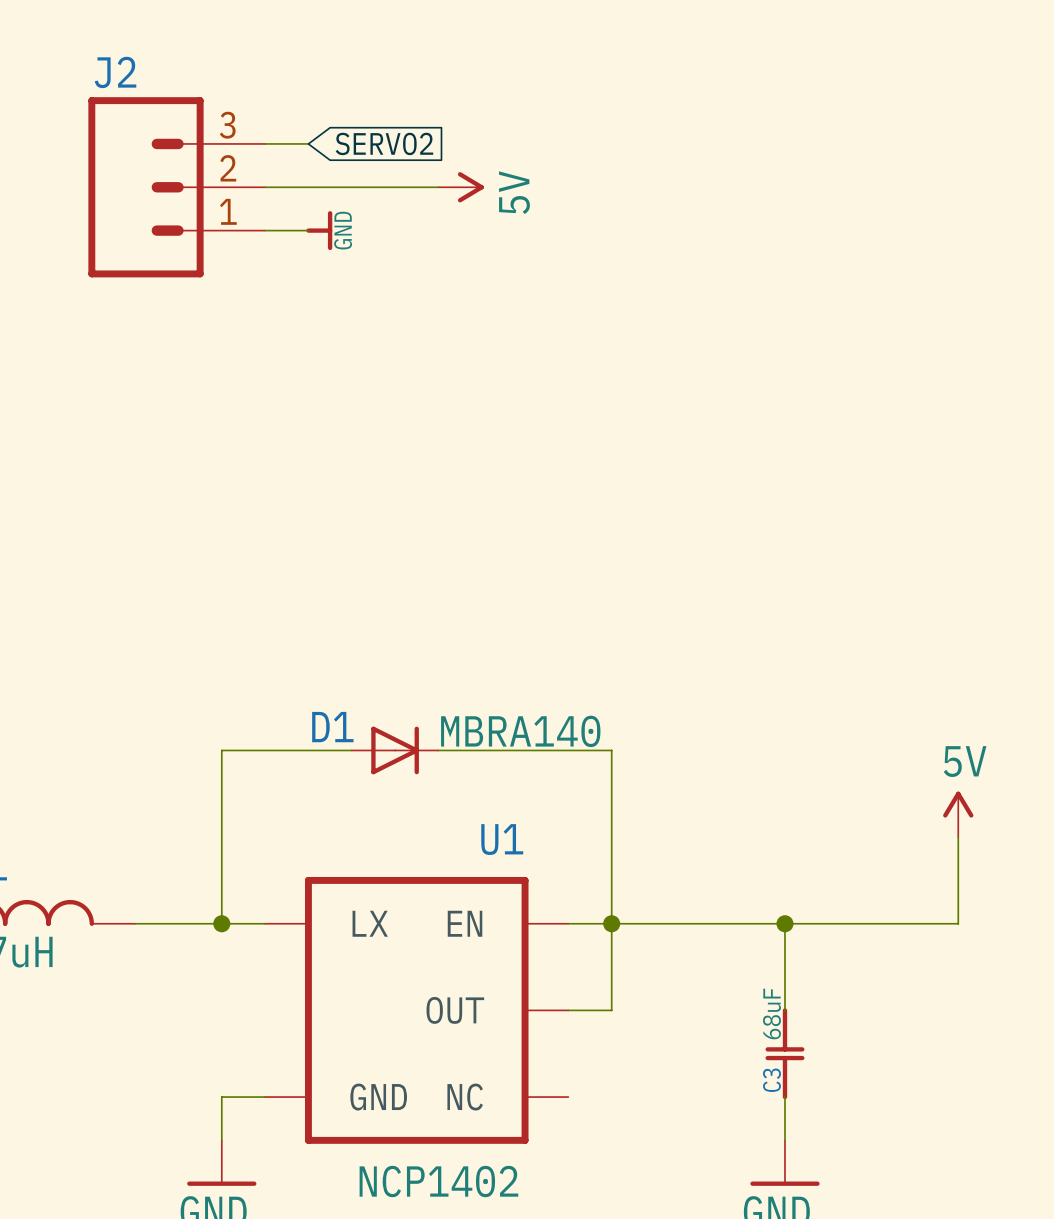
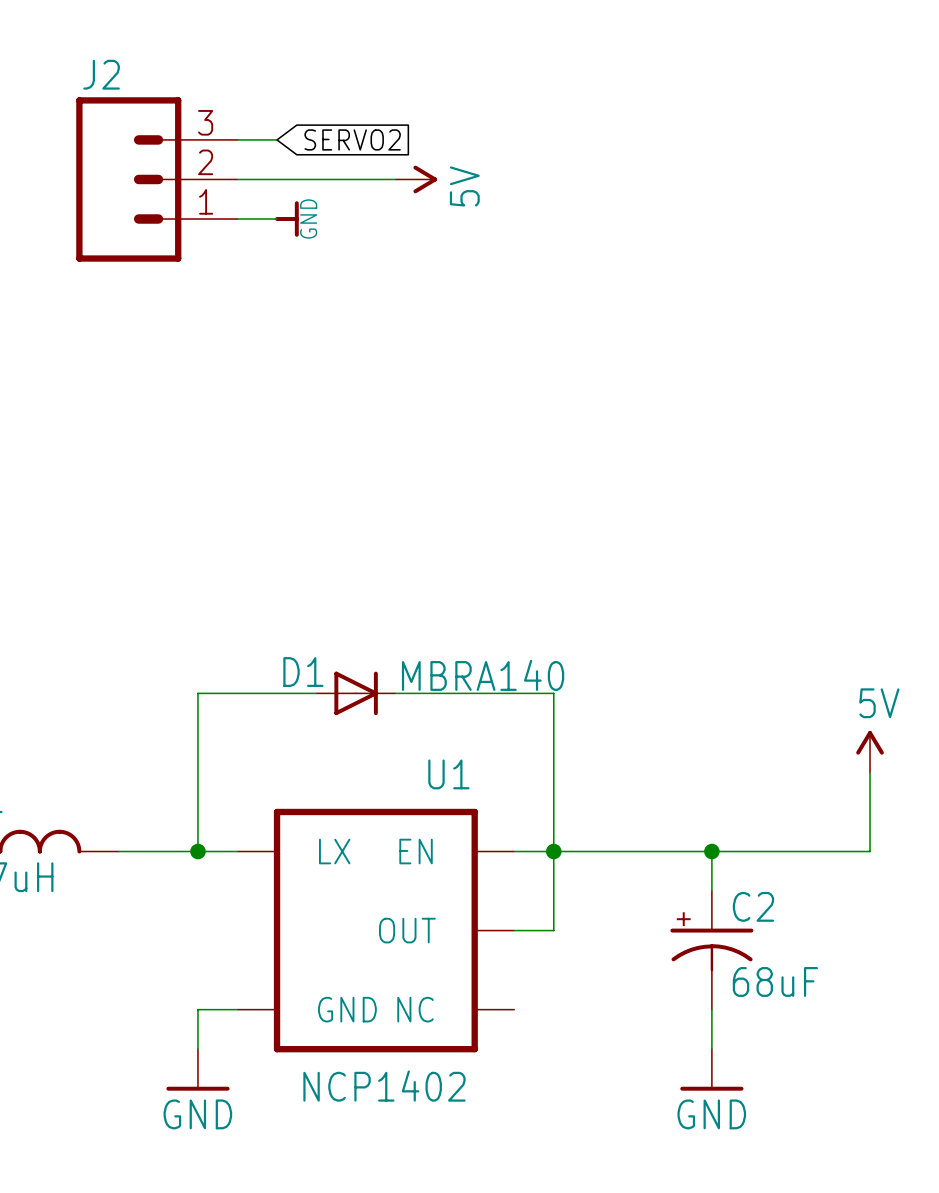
C2: none -> 68uF (711, 950)
C3: 68uF (784, 1053) -> none

